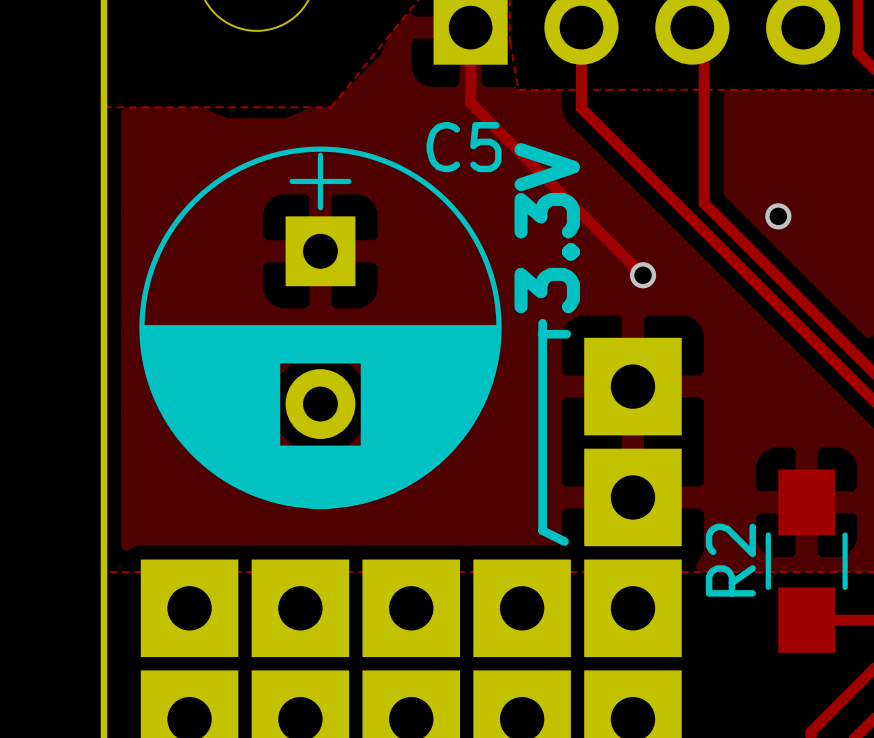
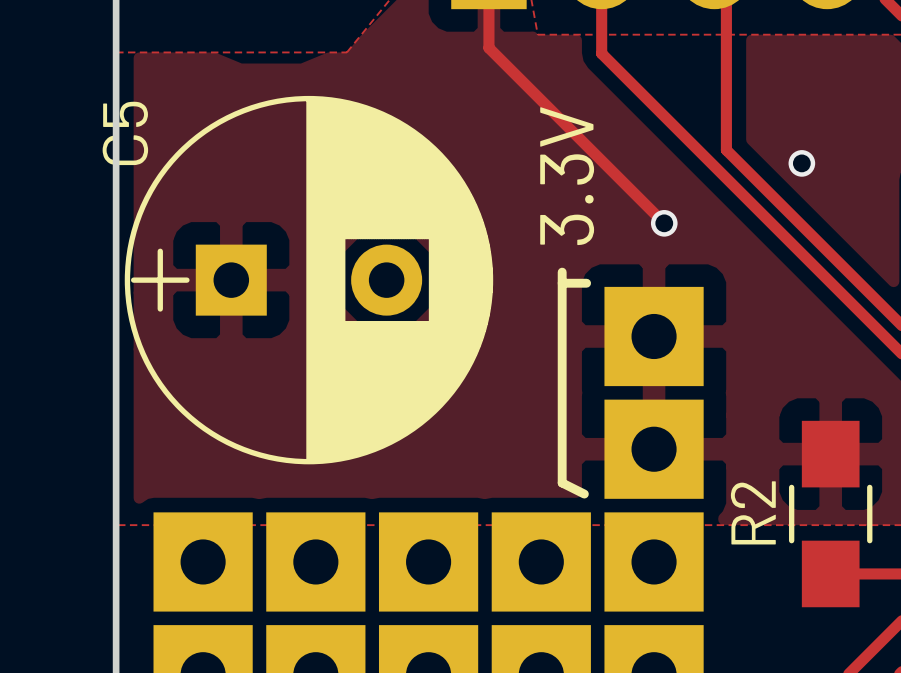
C5 rotation: 0° (320, 327) -> 90° counterclockwise (308, 280)

